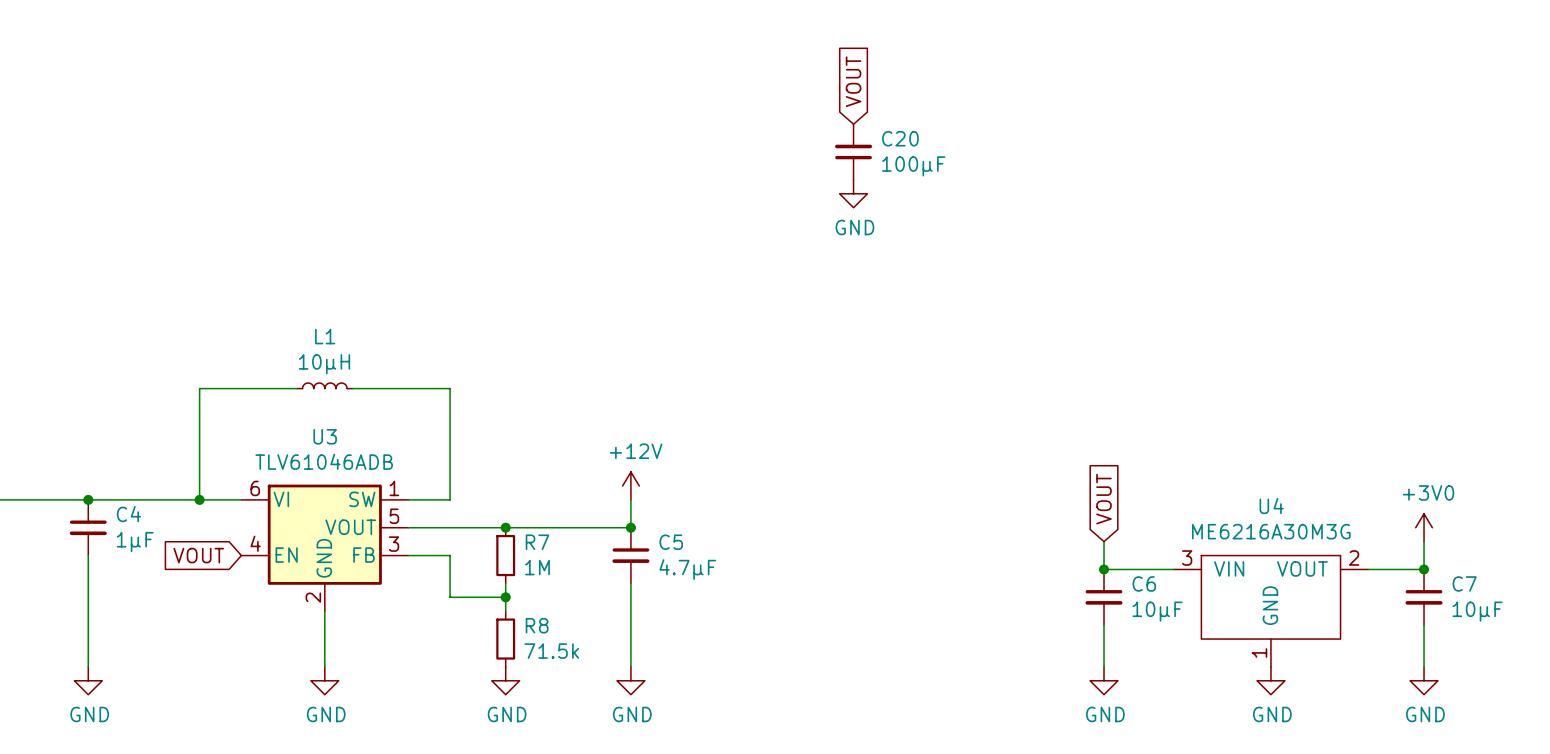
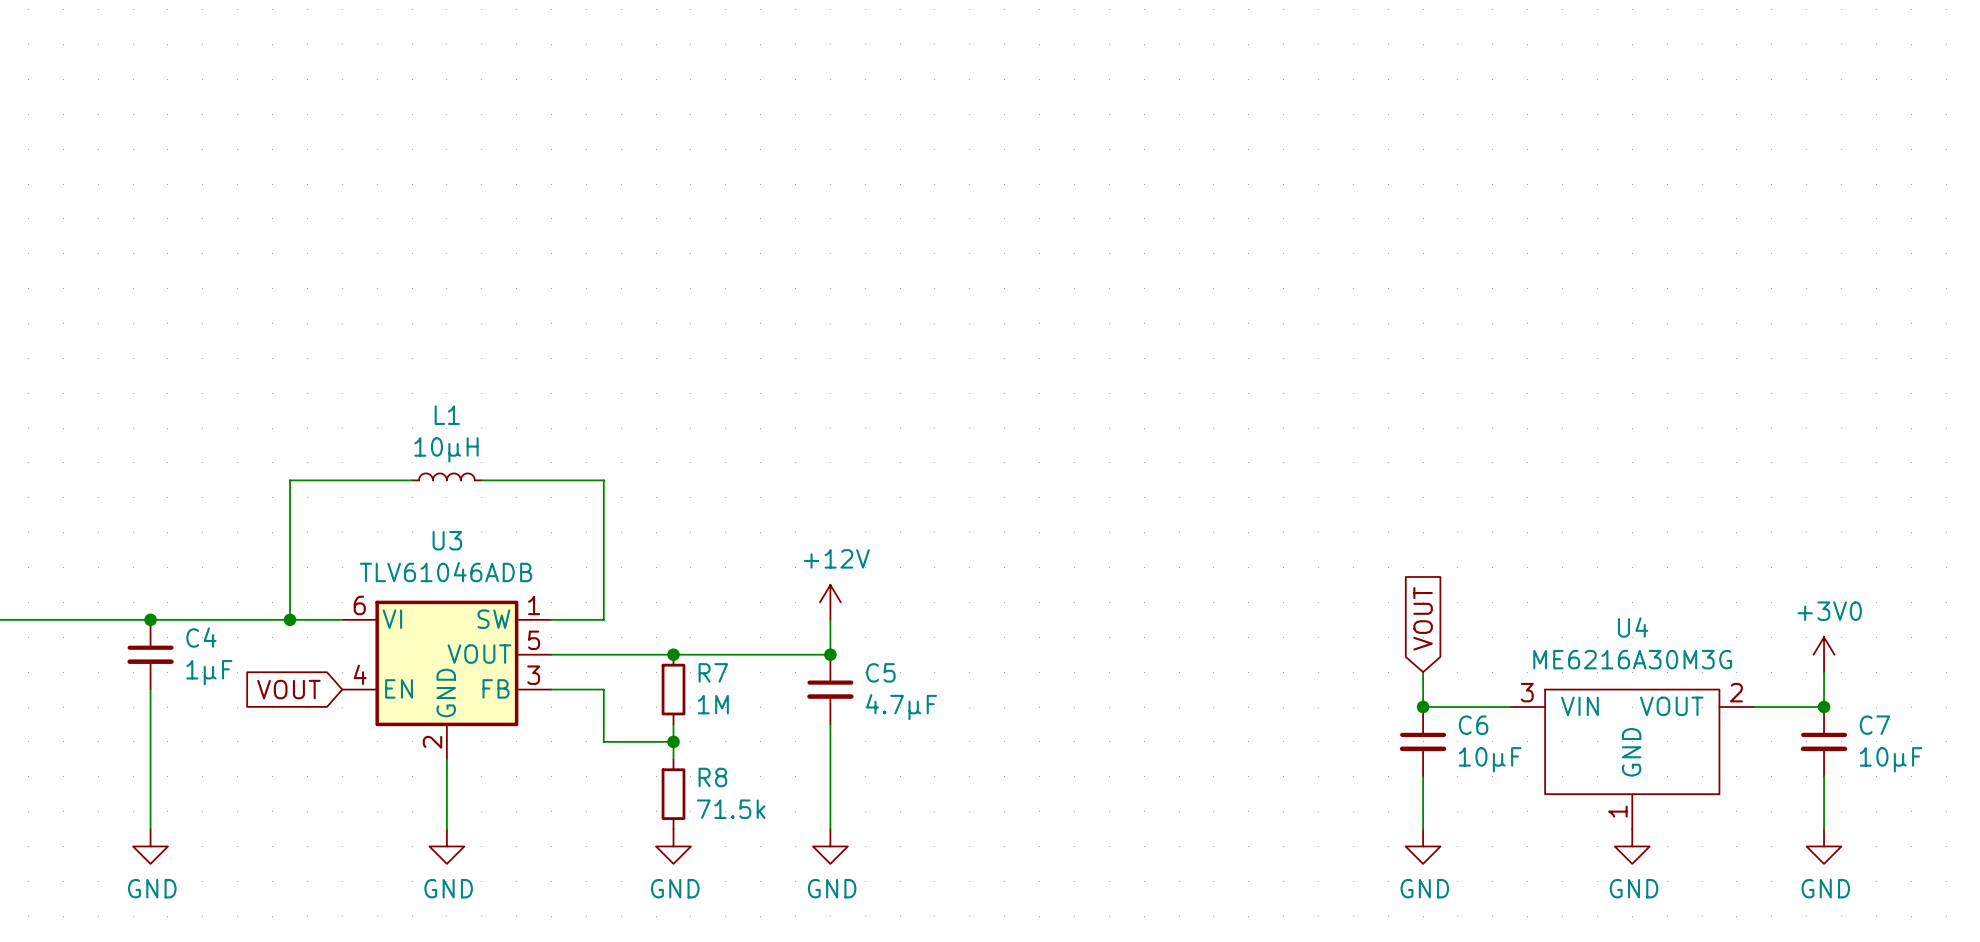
global label: VOUT (853, 81) -> none
C20: 100µF (853, 152) -> none
power symbol: GND (853, 193) -> none

